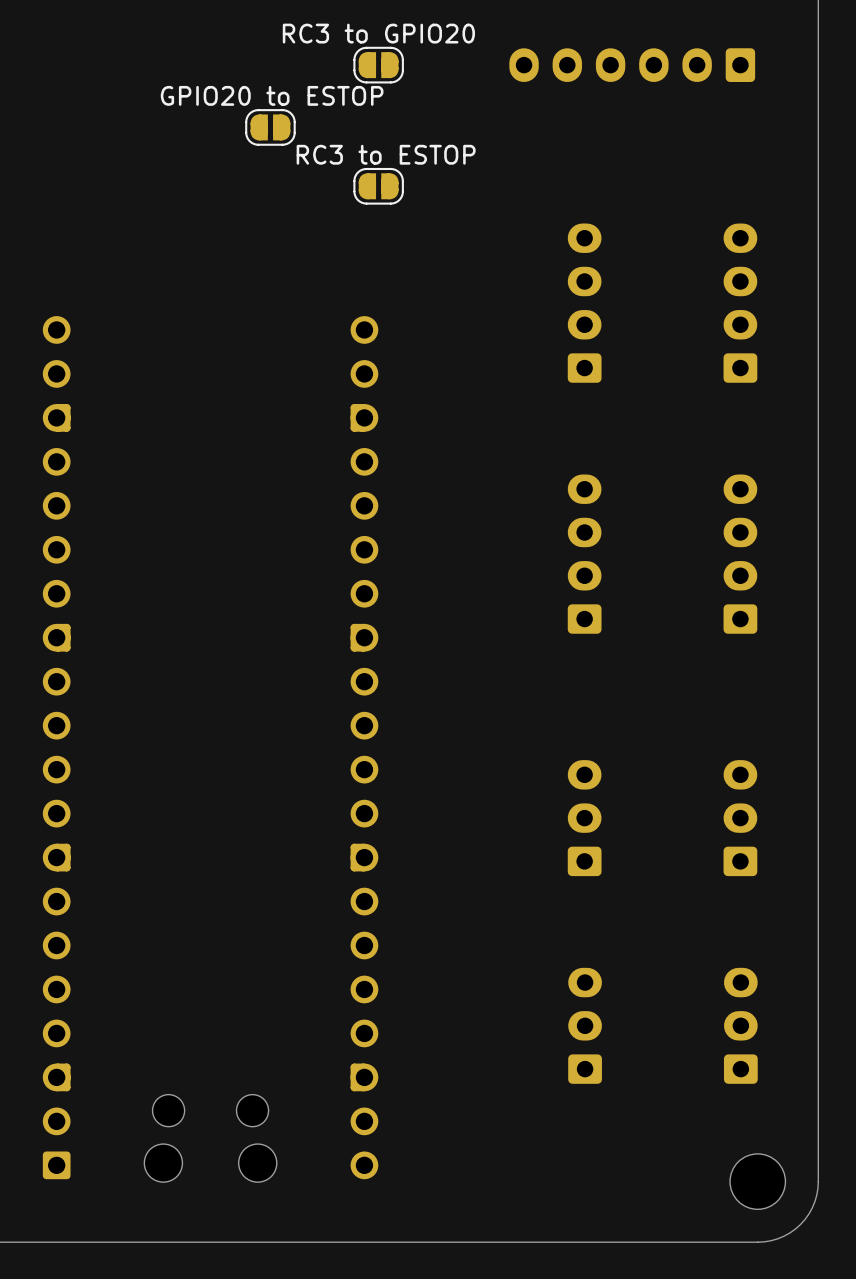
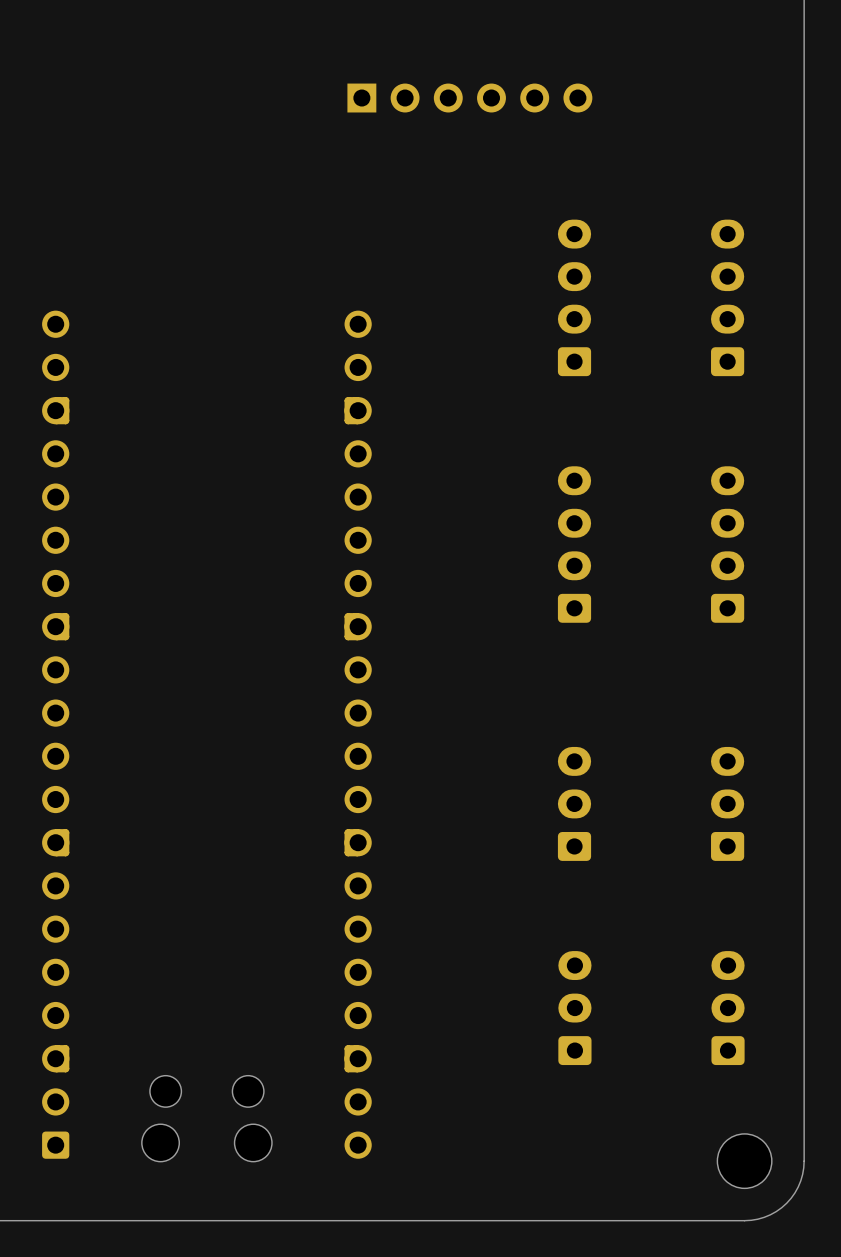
text: RC3 to GPIO20 (378, 33) -> none
part: (378, 65) -> none
part: (632, 65) -> none
text: GPIO20 to ESTOP (272, 95) -> none
part: none -> (469, 98)
part: (270, 127) -> none
text: RC3 to ESTOP (386, 154) -> none
part: (378, 186) -> none

